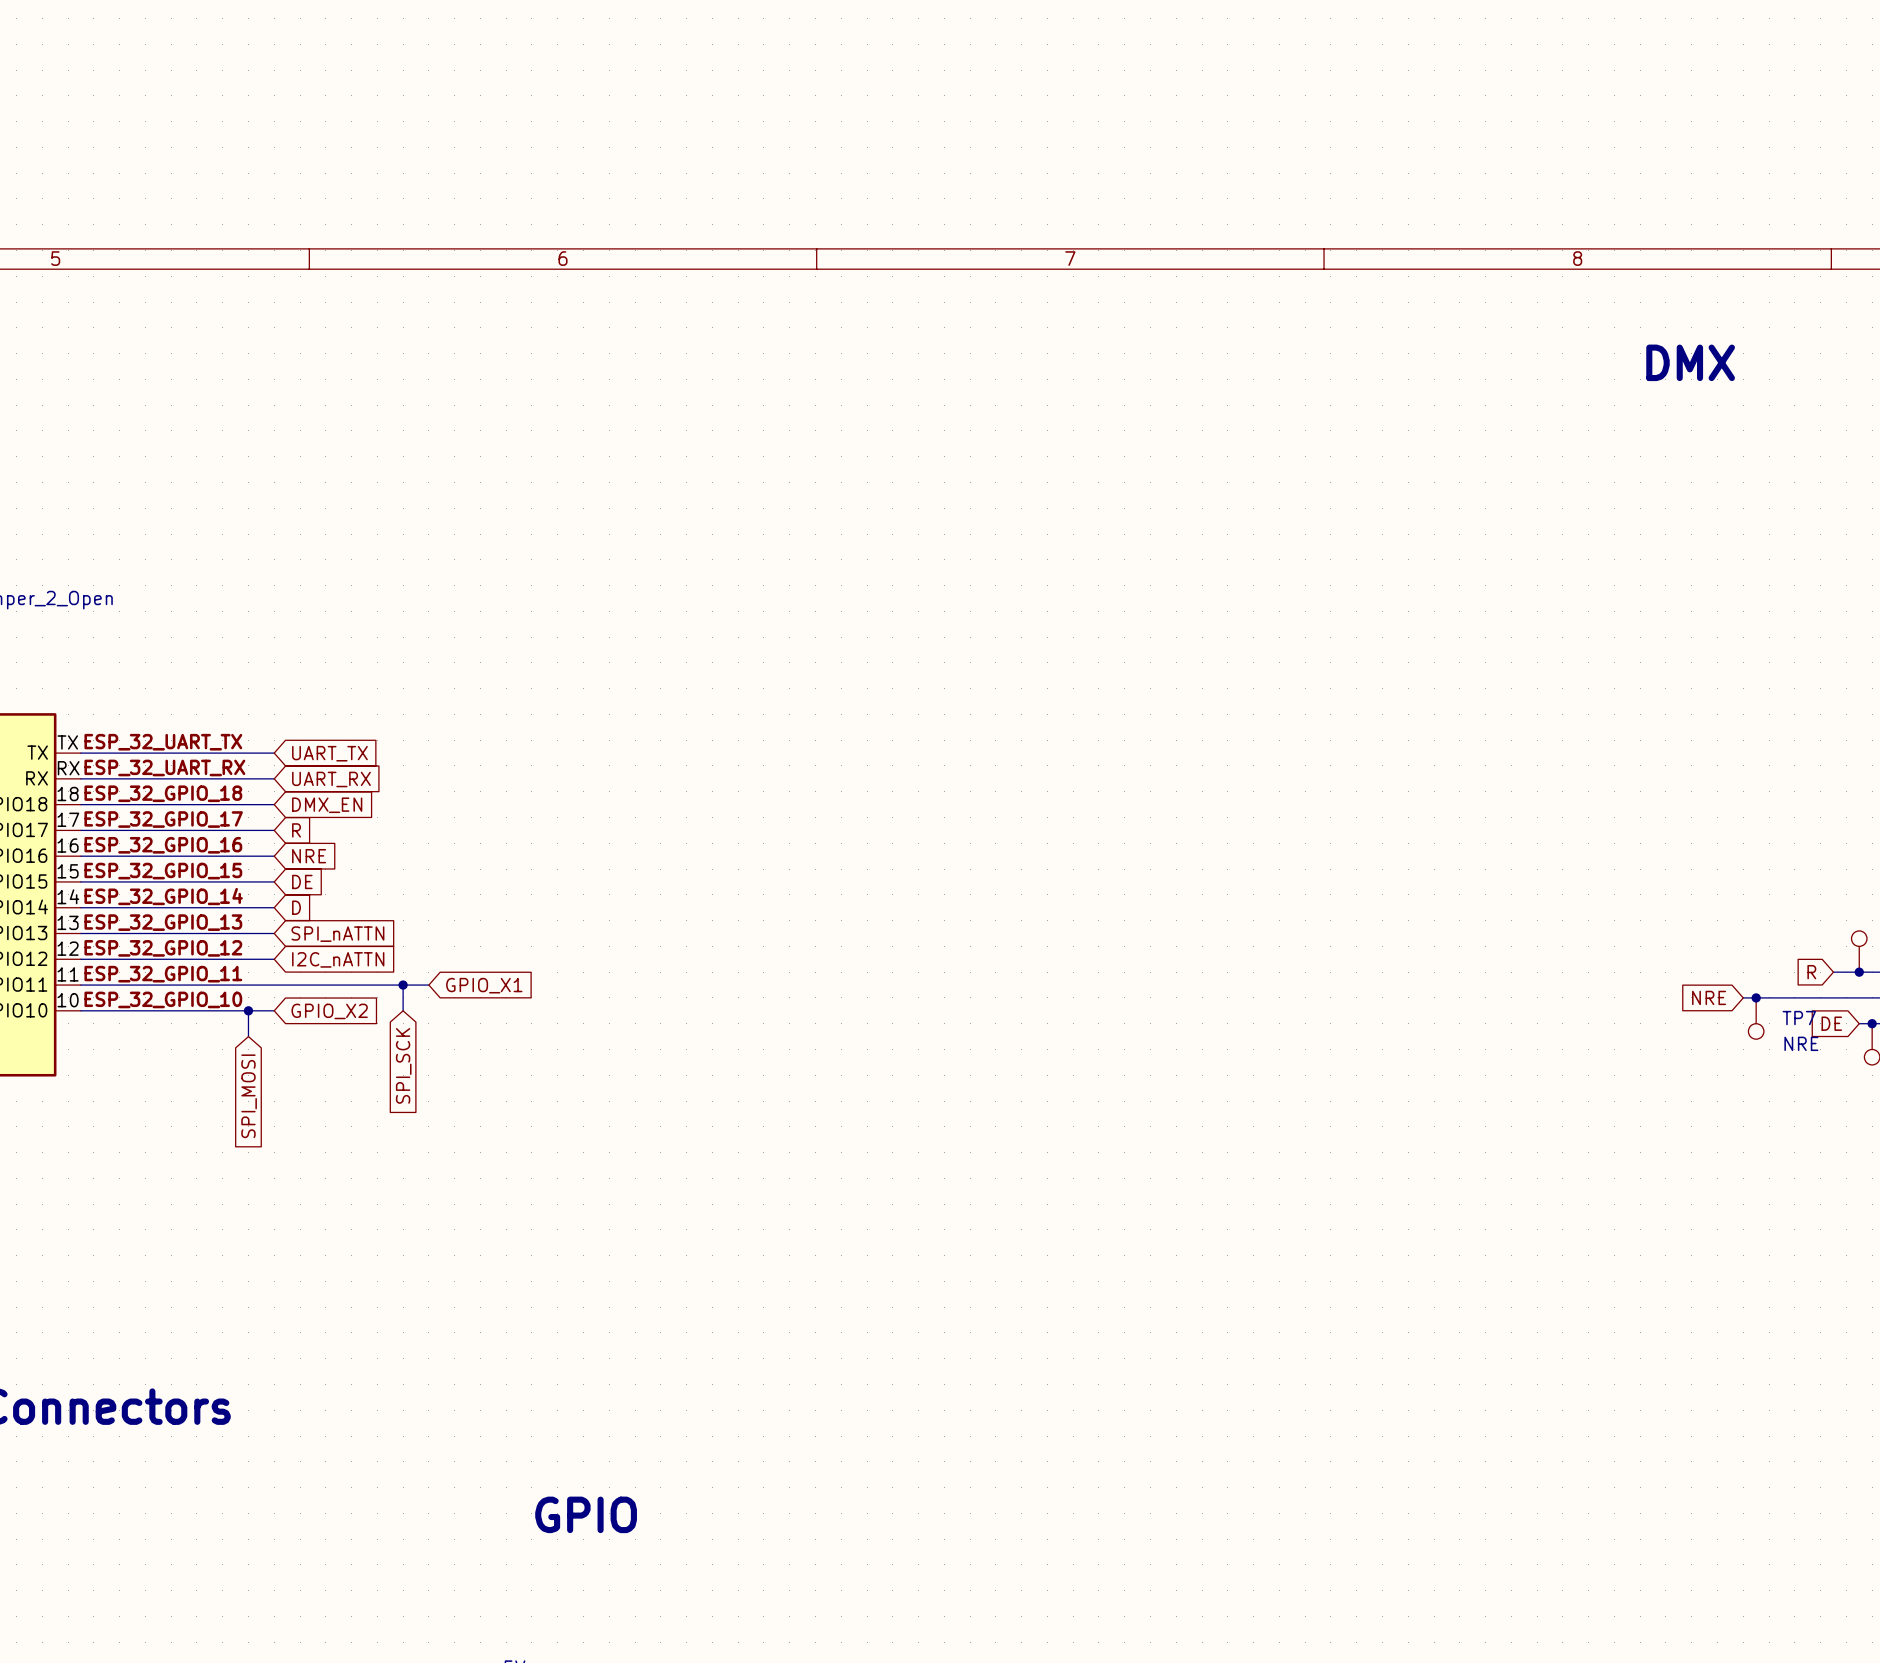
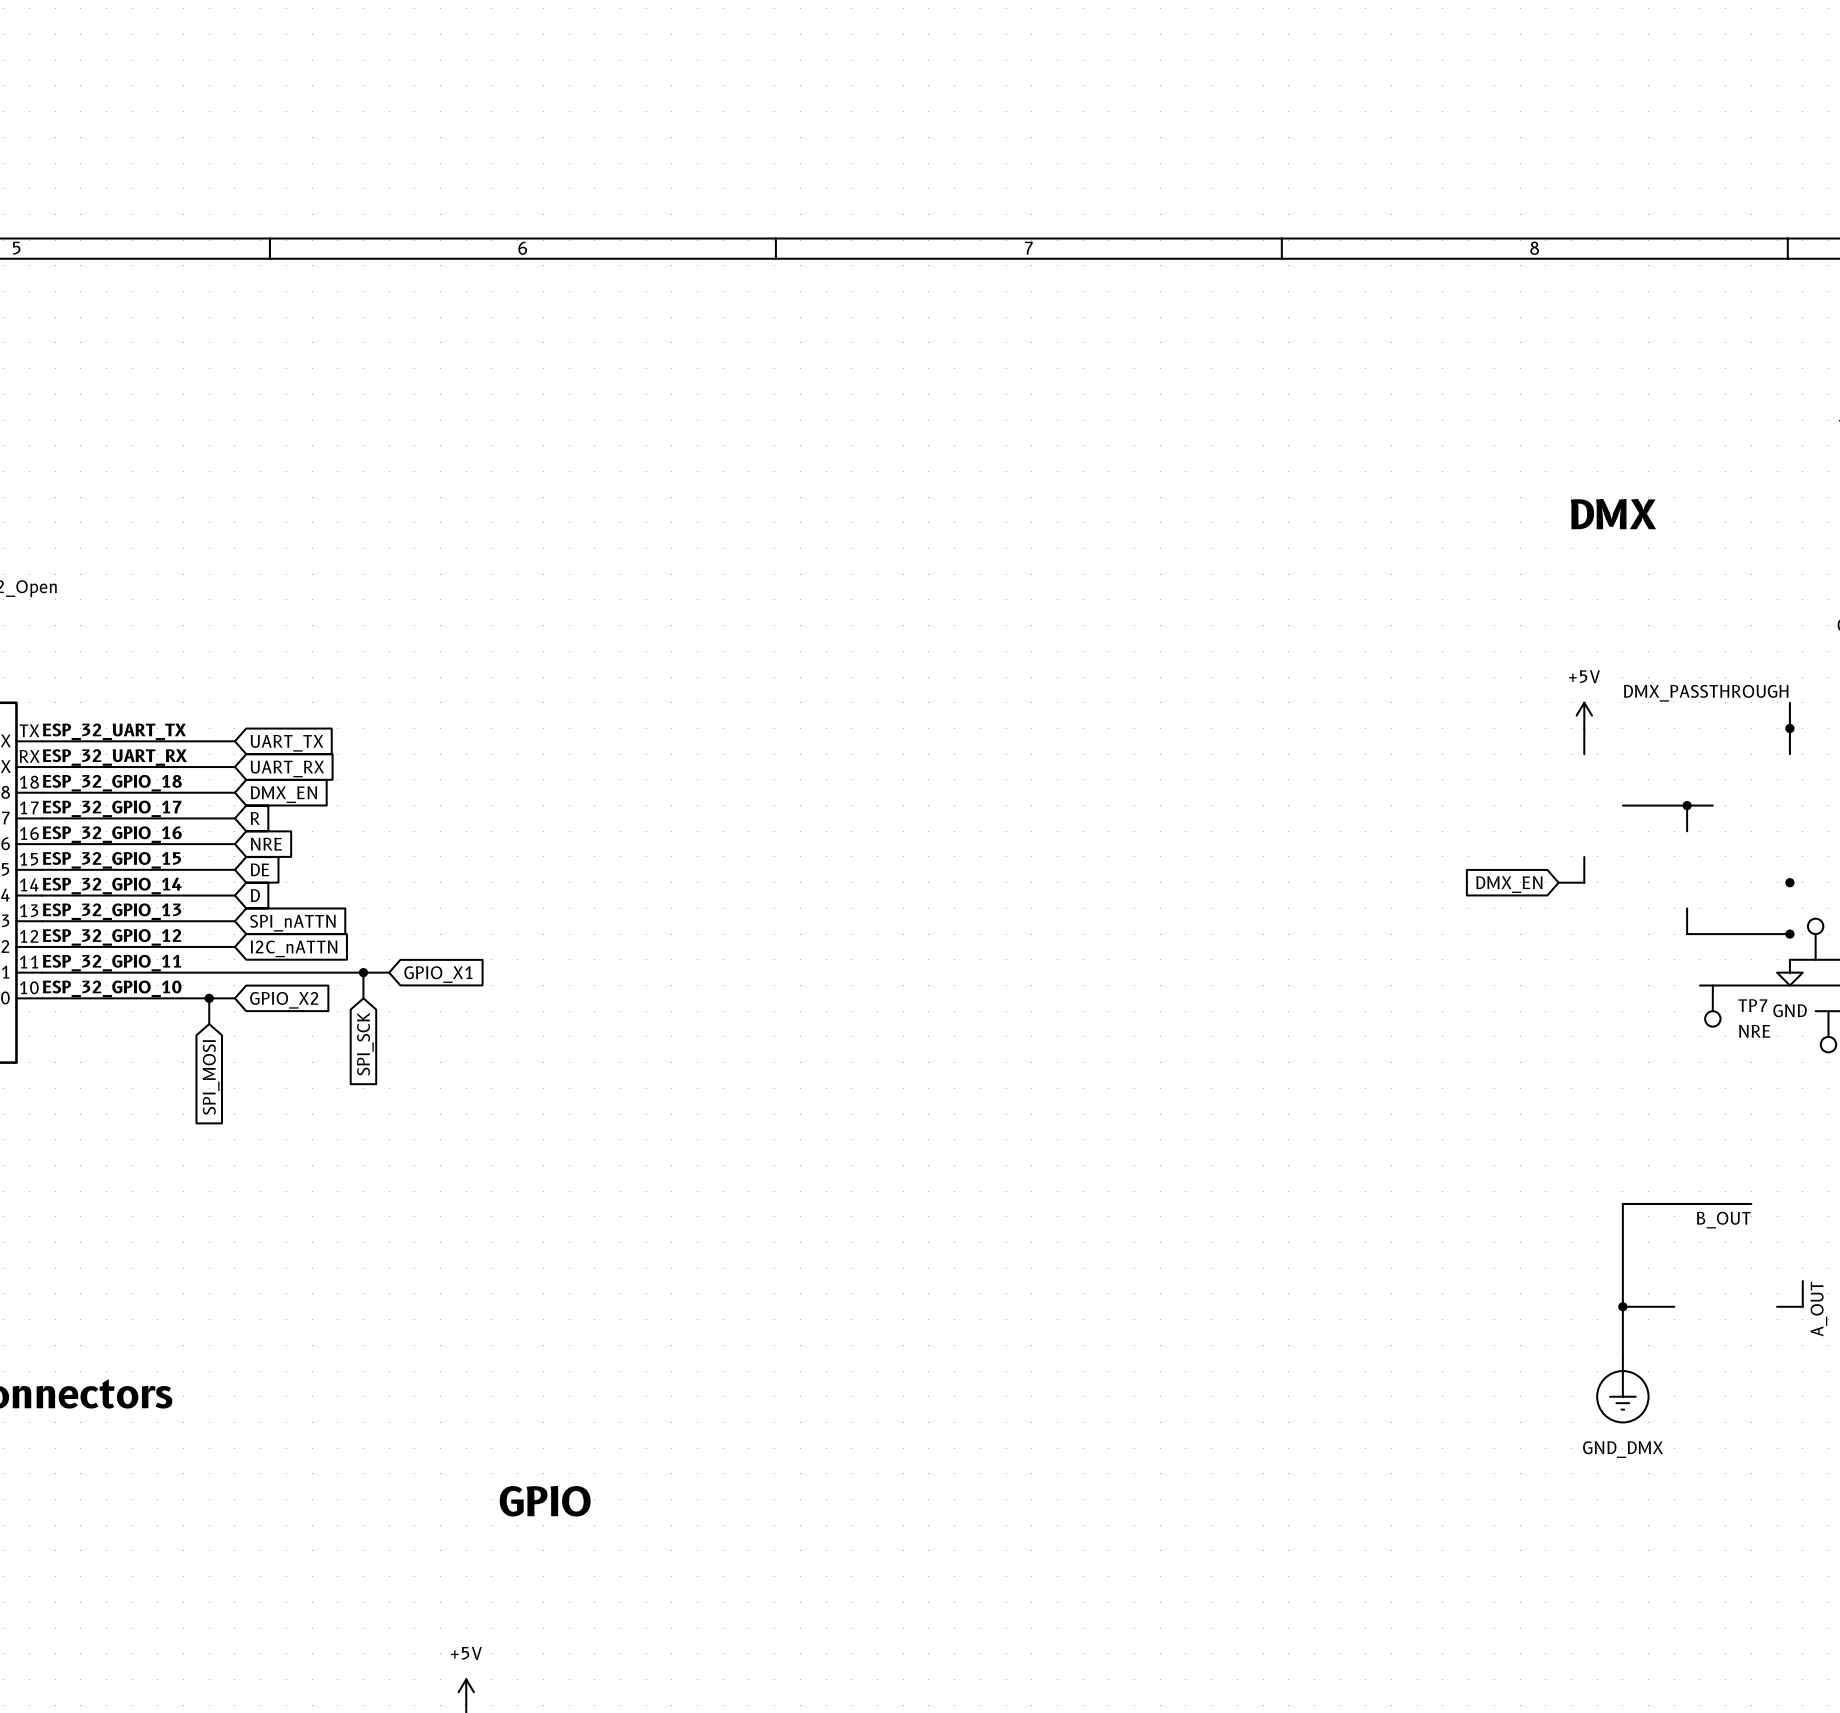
text position: DMX (1690, 362) -> DMX (1613, 514)
label: none -> DMX_PASSTHROUGH (1706, 693)
wire: none -> (1789, 702) (1789, 754)
power symbol: none -> +5V (1584, 715)
wire: none -> (1584, 728) (1584, 754)
junction: none -> (1789, 728)
wire: none -> (1622, 805) (1712, 805)
wire: none -> (1687, 805) (1687, 831)
junction: none -> (1687, 805)
wire: none -> (1584, 856) (1584, 882) (1558, 882)
junction: none -> (1789, 882)
global label: none -> DMX_EN (1509, 884)
wire: none -> (1687, 908) (1687, 934) (1789, 934)
global label: R (1811, 972) -> none
junction position: (1859, 972) -> (1789, 934)
power symbol: none -> GND (1789, 972)
global label: NRE (1709, 997) -> none
junction: (1756, 997) -> none
global label: DE (1831, 1023) -> none
junction: (1872, 1023) -> none
wire: none -> (1751, 1203) (1622, 1203) (1622, 1358)
label: none -> B_OUT (1723, 1220)
wire: none -> (1802, 1281) (1802, 1306) (1777, 1306)
wire: none -> (1622, 1306) (1674, 1306)
junction: none -> (1622, 1306)
label: none -> A_OUT (1818, 1309)
power symbol: none -> GND_DMX (1622, 1390)

